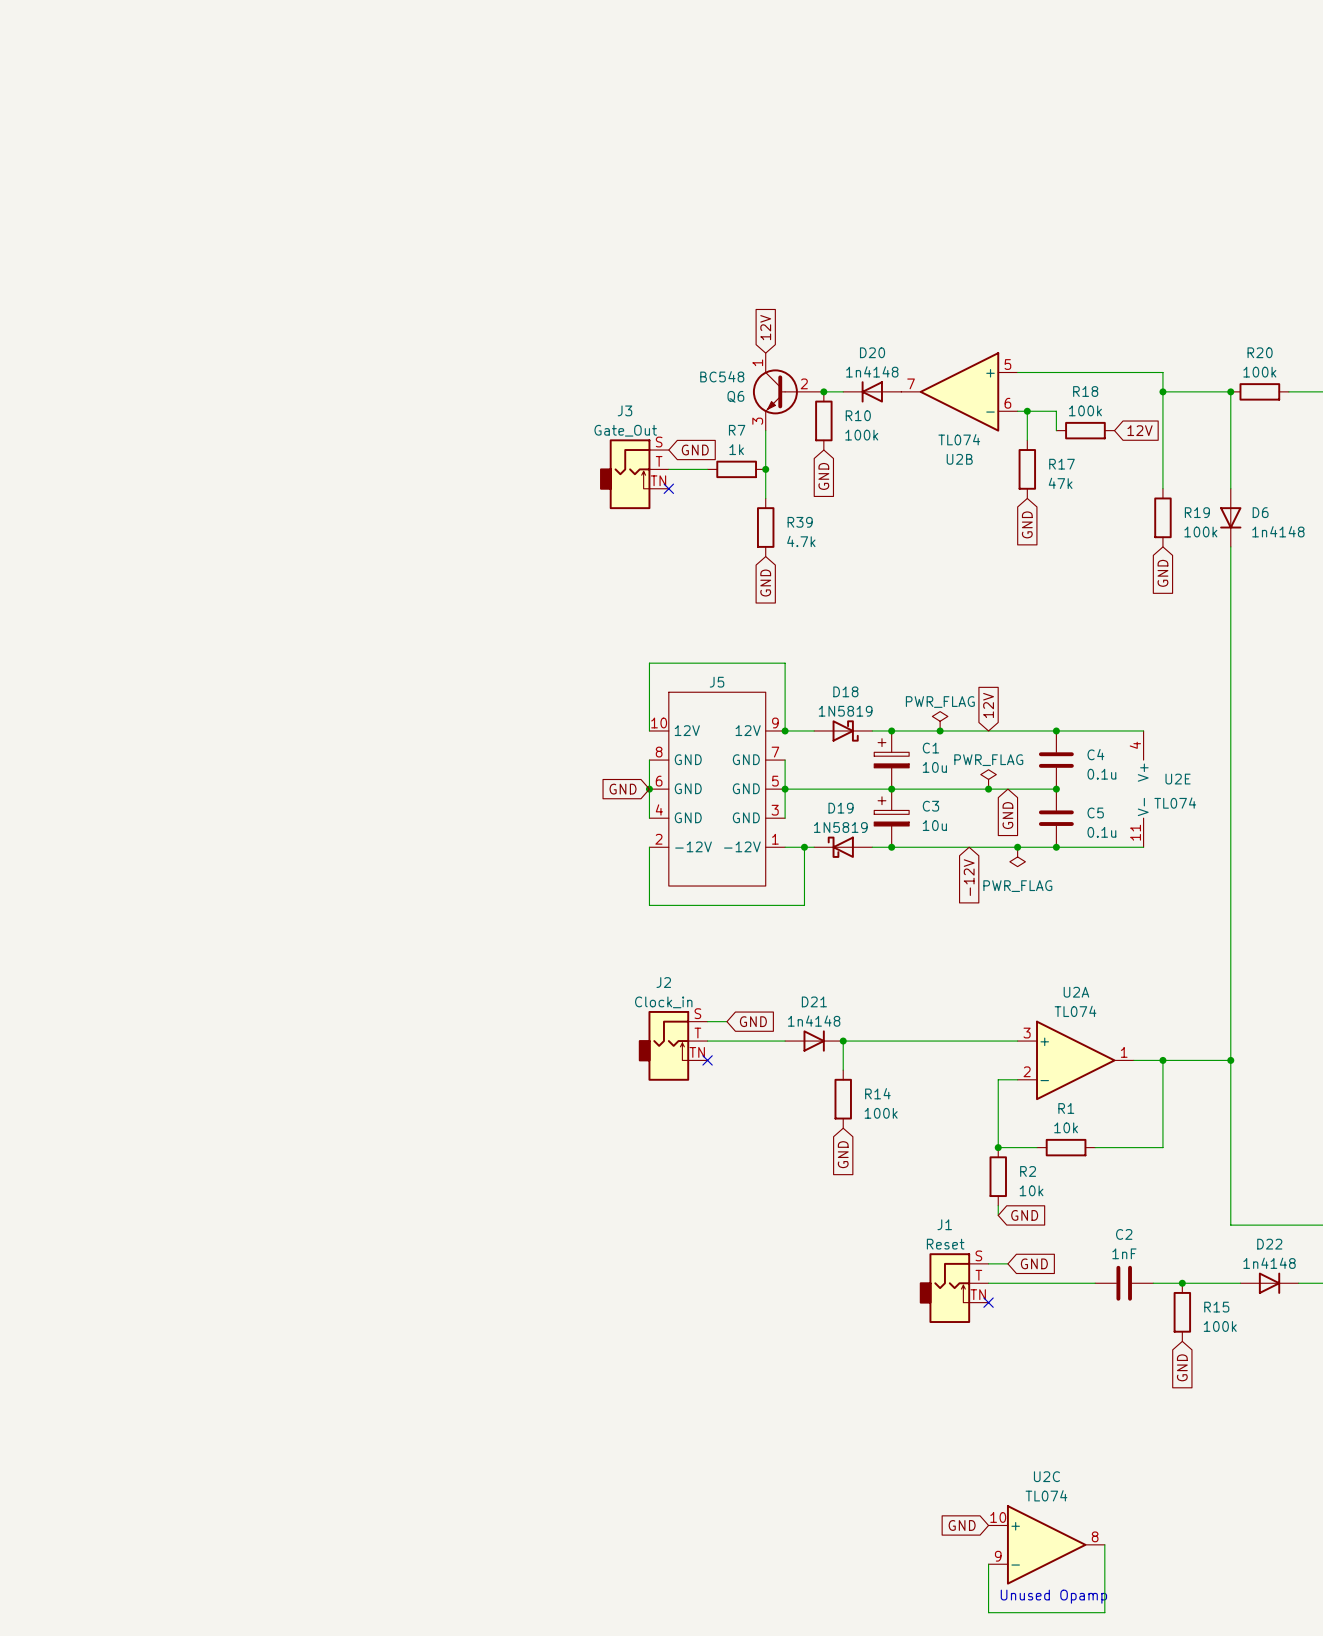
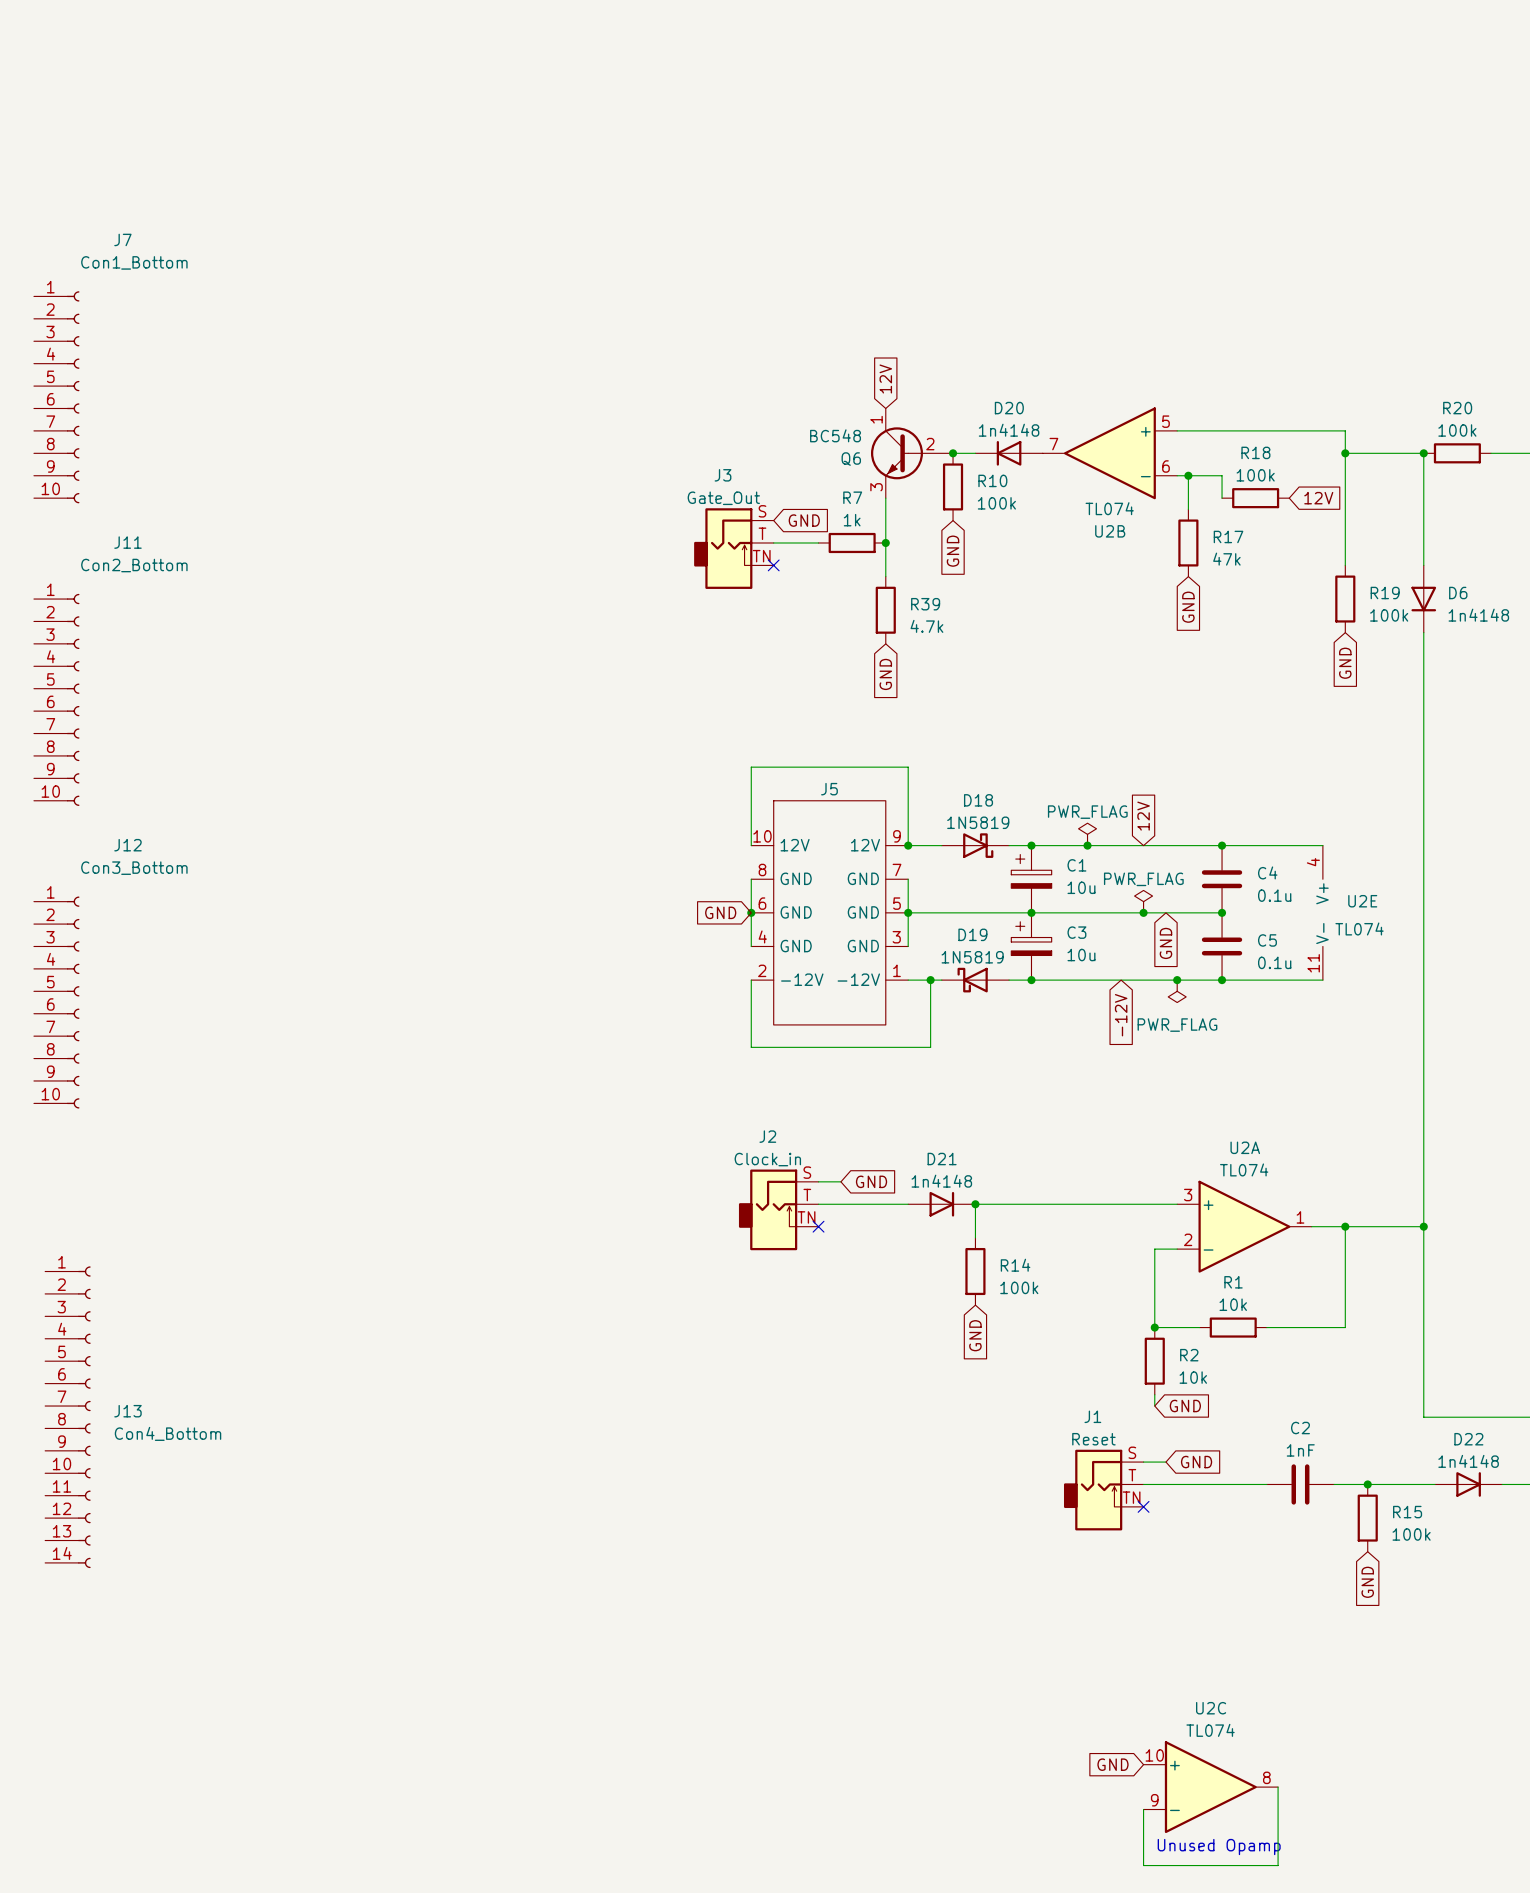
J7: none -> Con1_Bottom (56, 397)
J11: none -> Con2_Bottom (56, 699)
J12: none -> Con3_Bottom (56, 1002)
J13: none -> Con4_Bottom (67, 1417)

